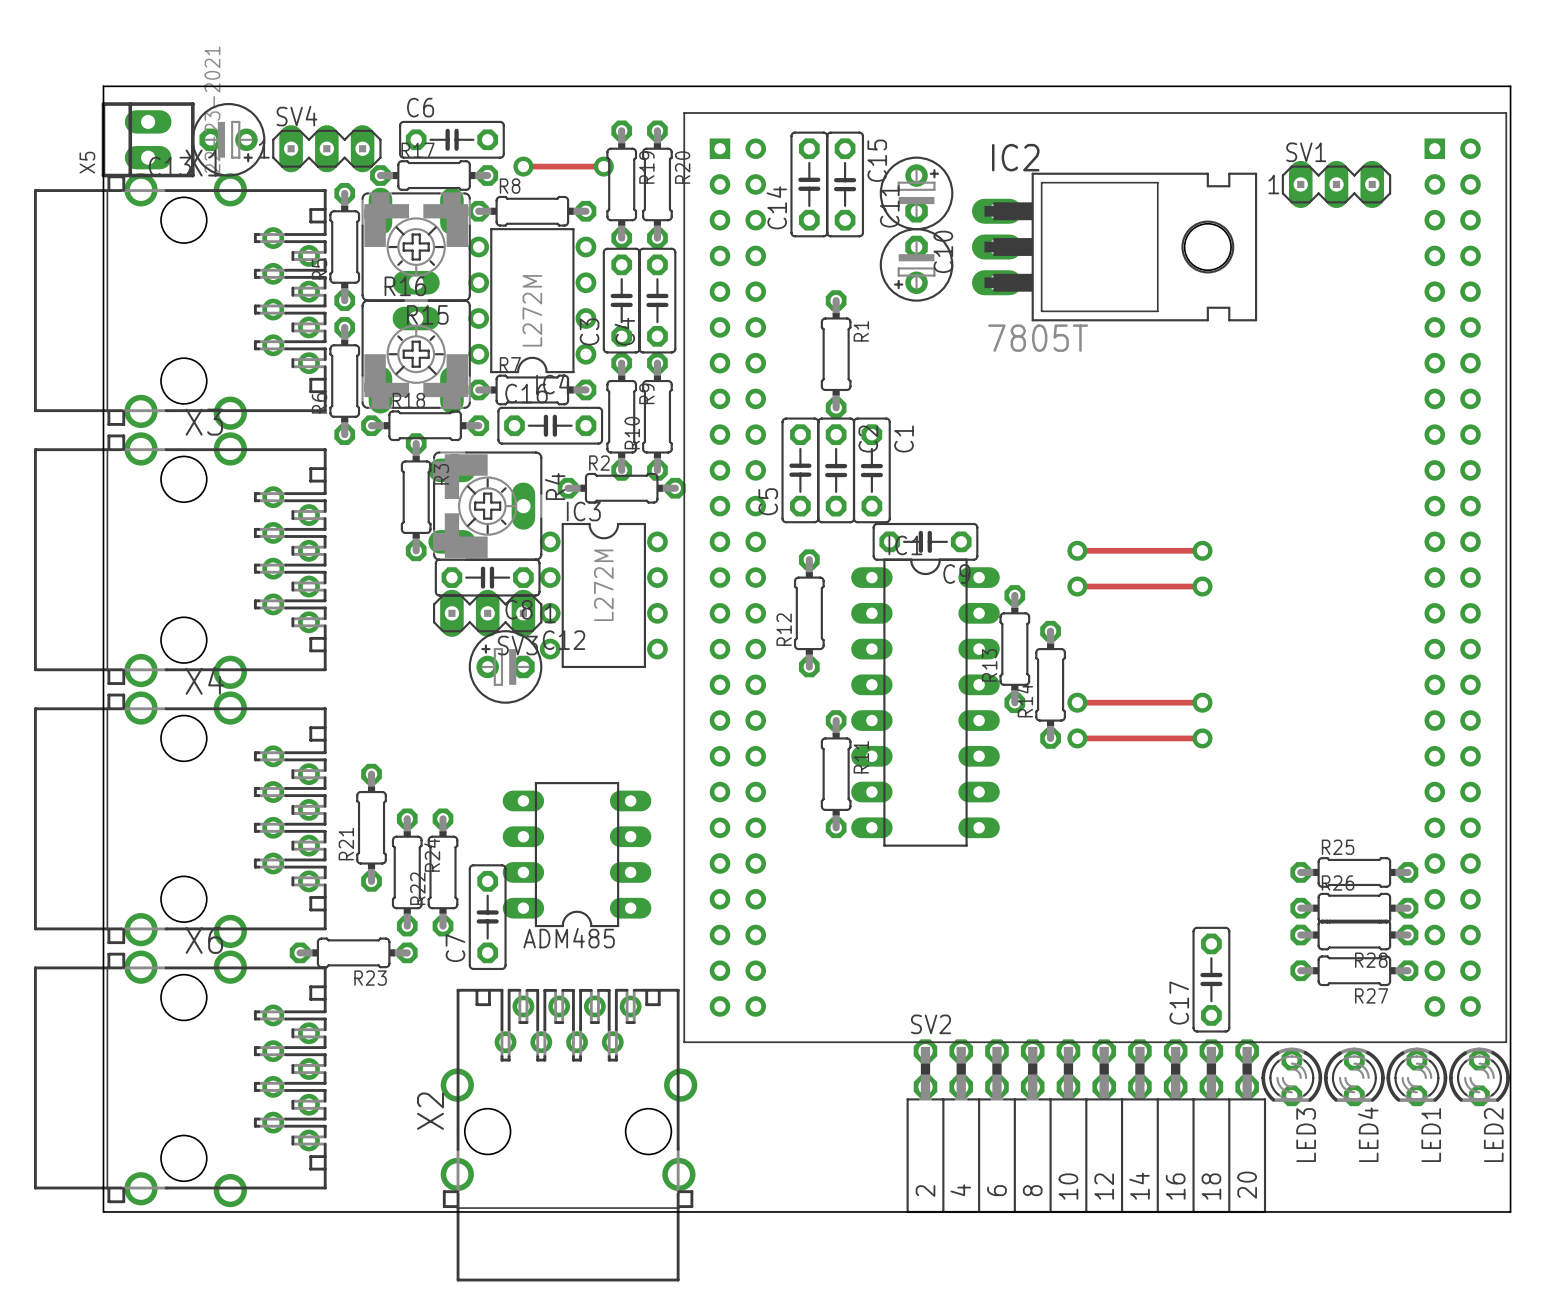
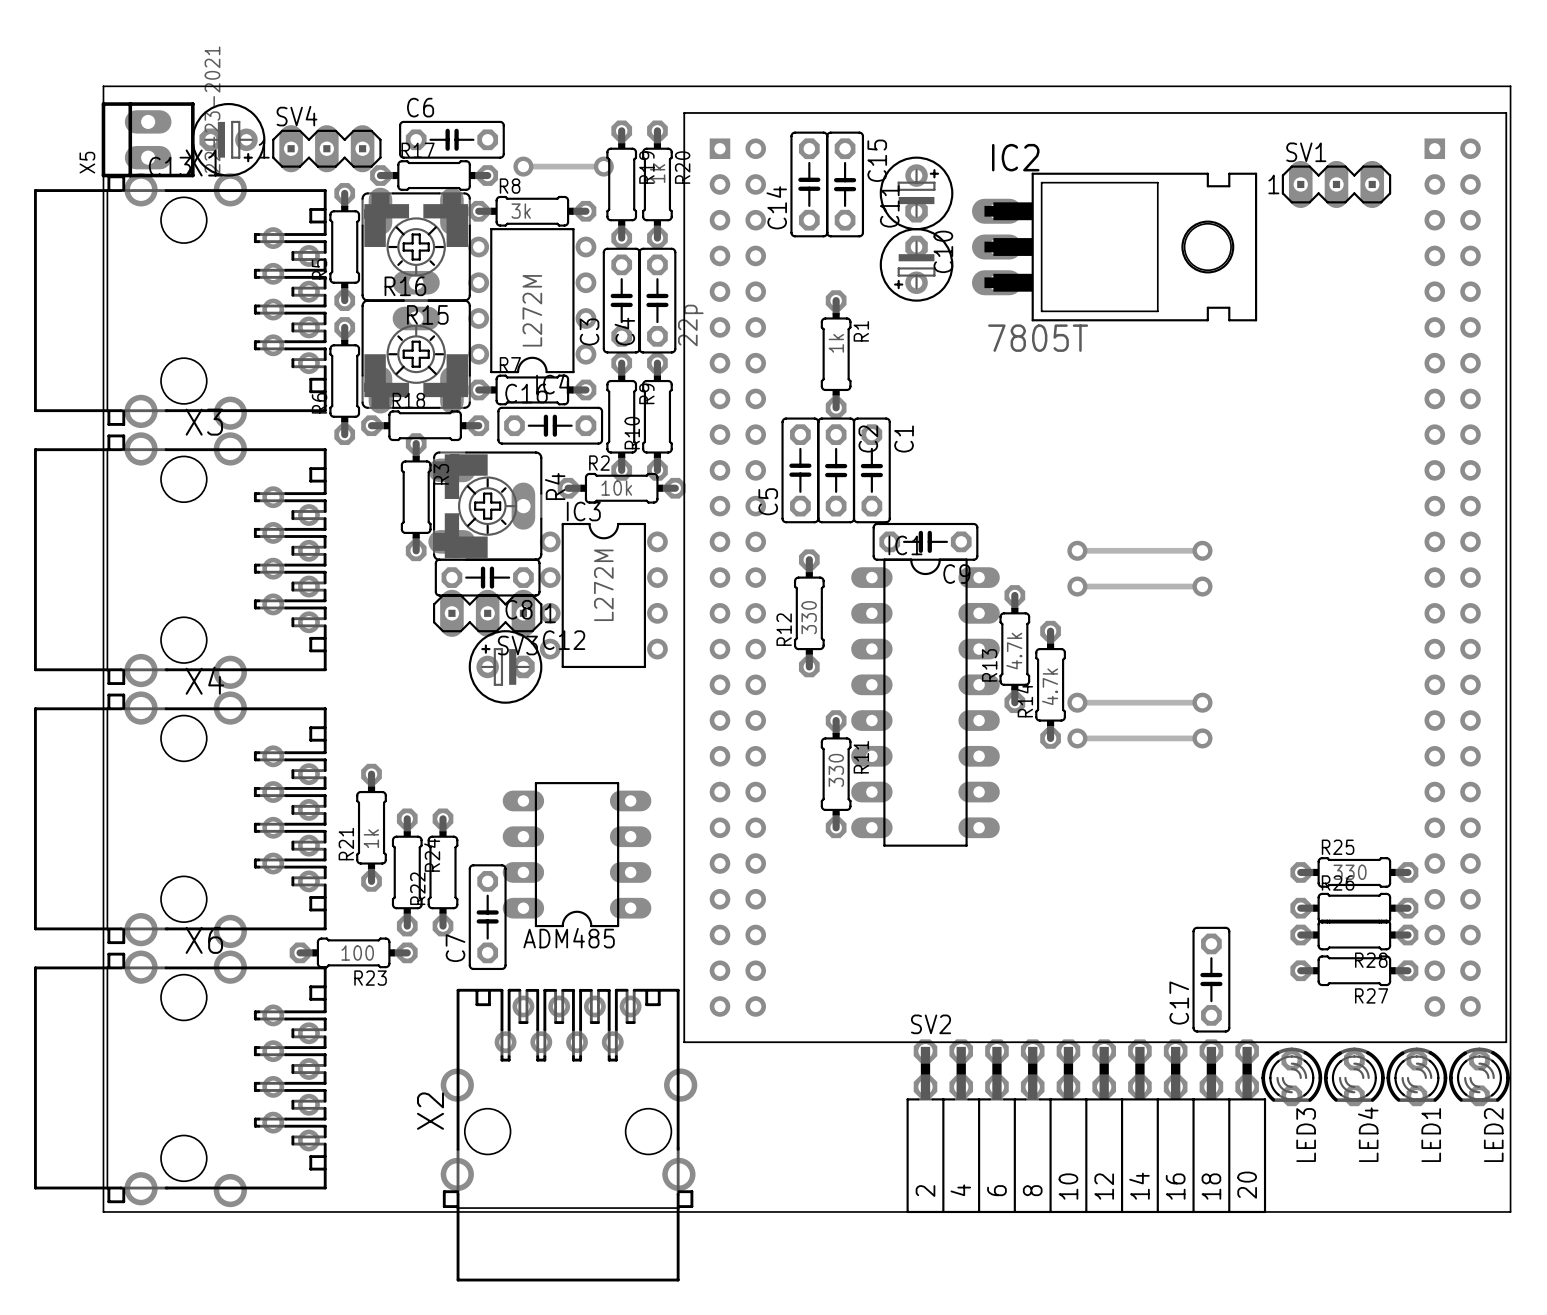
R20 value: none -> 1k (657, 173)
R8 value: none -> 3k (521, 211)
C4 value: none -> 22p (690, 325)
R1 value: none -> 1k (836, 343)
R2 value: none -> 10k (616, 488)
R12 value: none -> 330 (809, 617)
R13 value: none -> 4.7k (1014, 651)
R14 value: none -> 4.7k (1050, 686)
R11 value: none -> 330 (836, 770)
R21 value: none -> 1k (371, 838)
R25 value: none -> 330 (1350, 872)
R23 value: none -> 100 (357, 953)

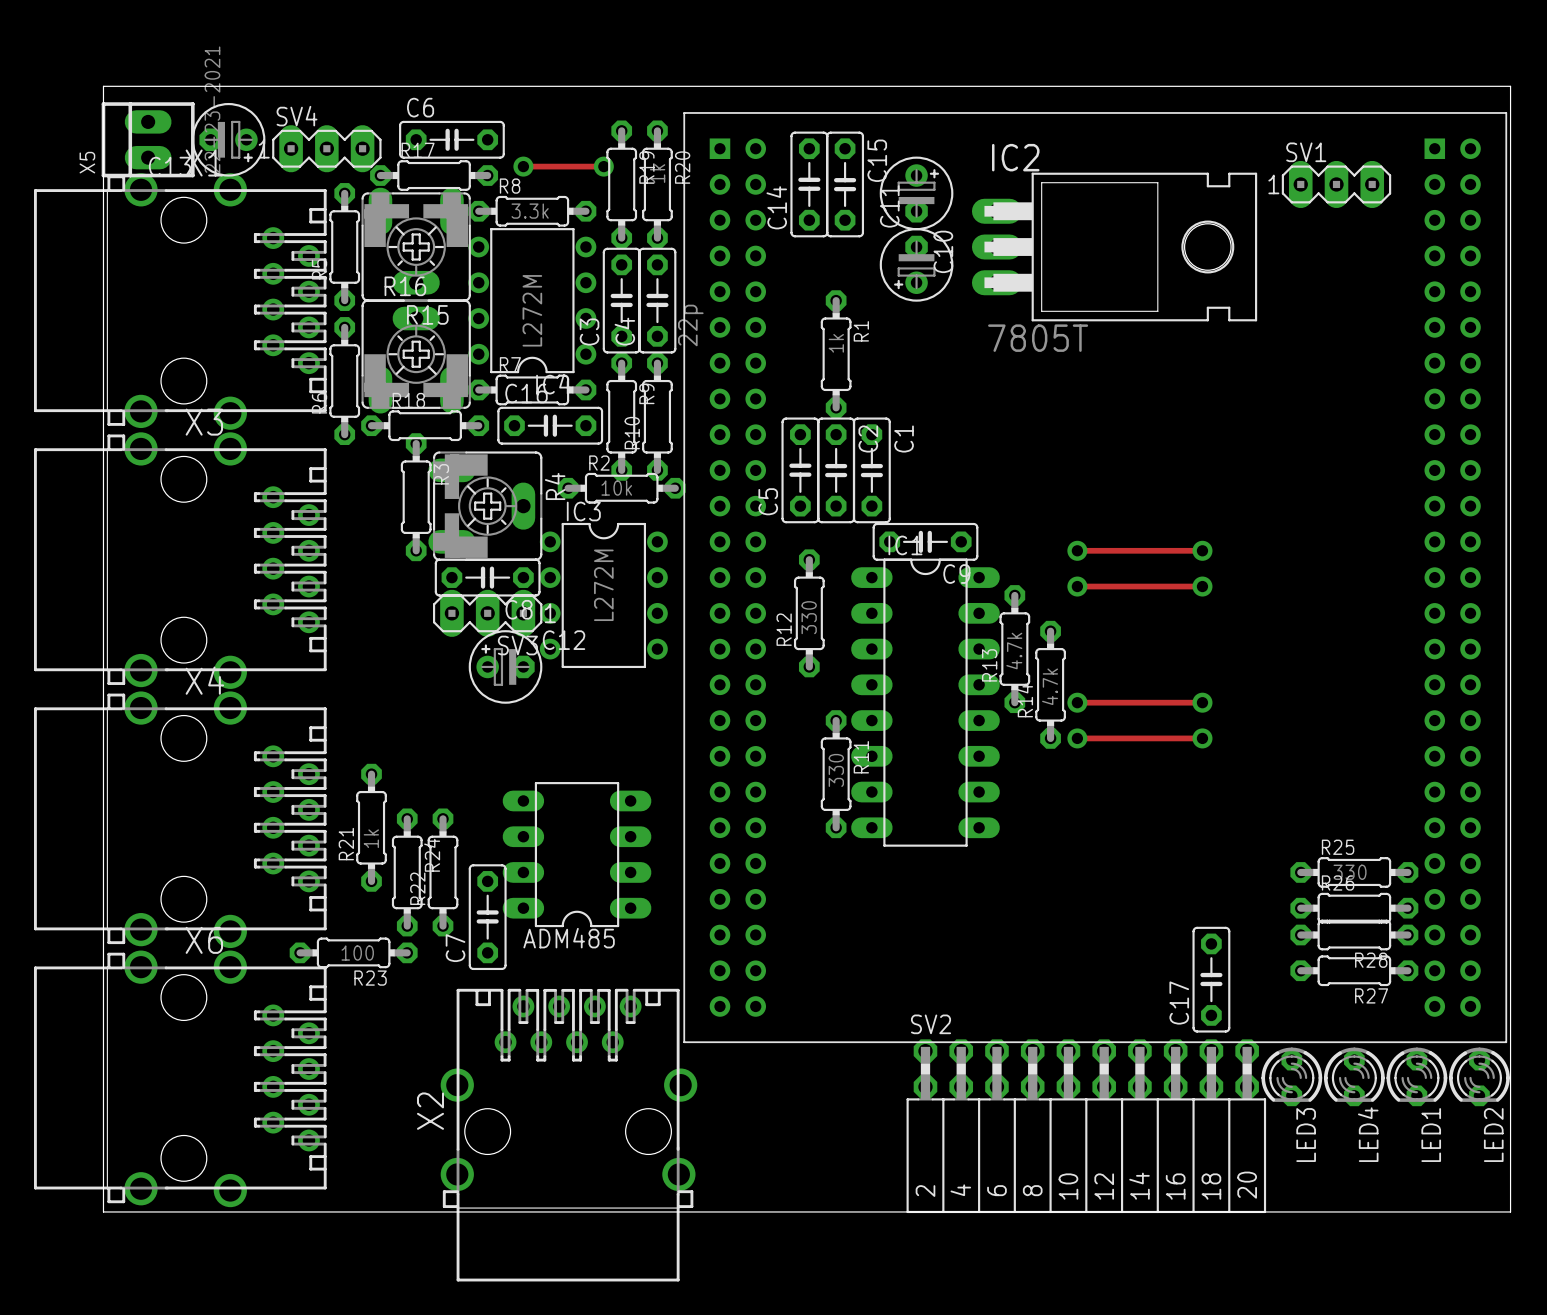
R8 value: 3k (521, 211) -> 3.3k (530, 211)

